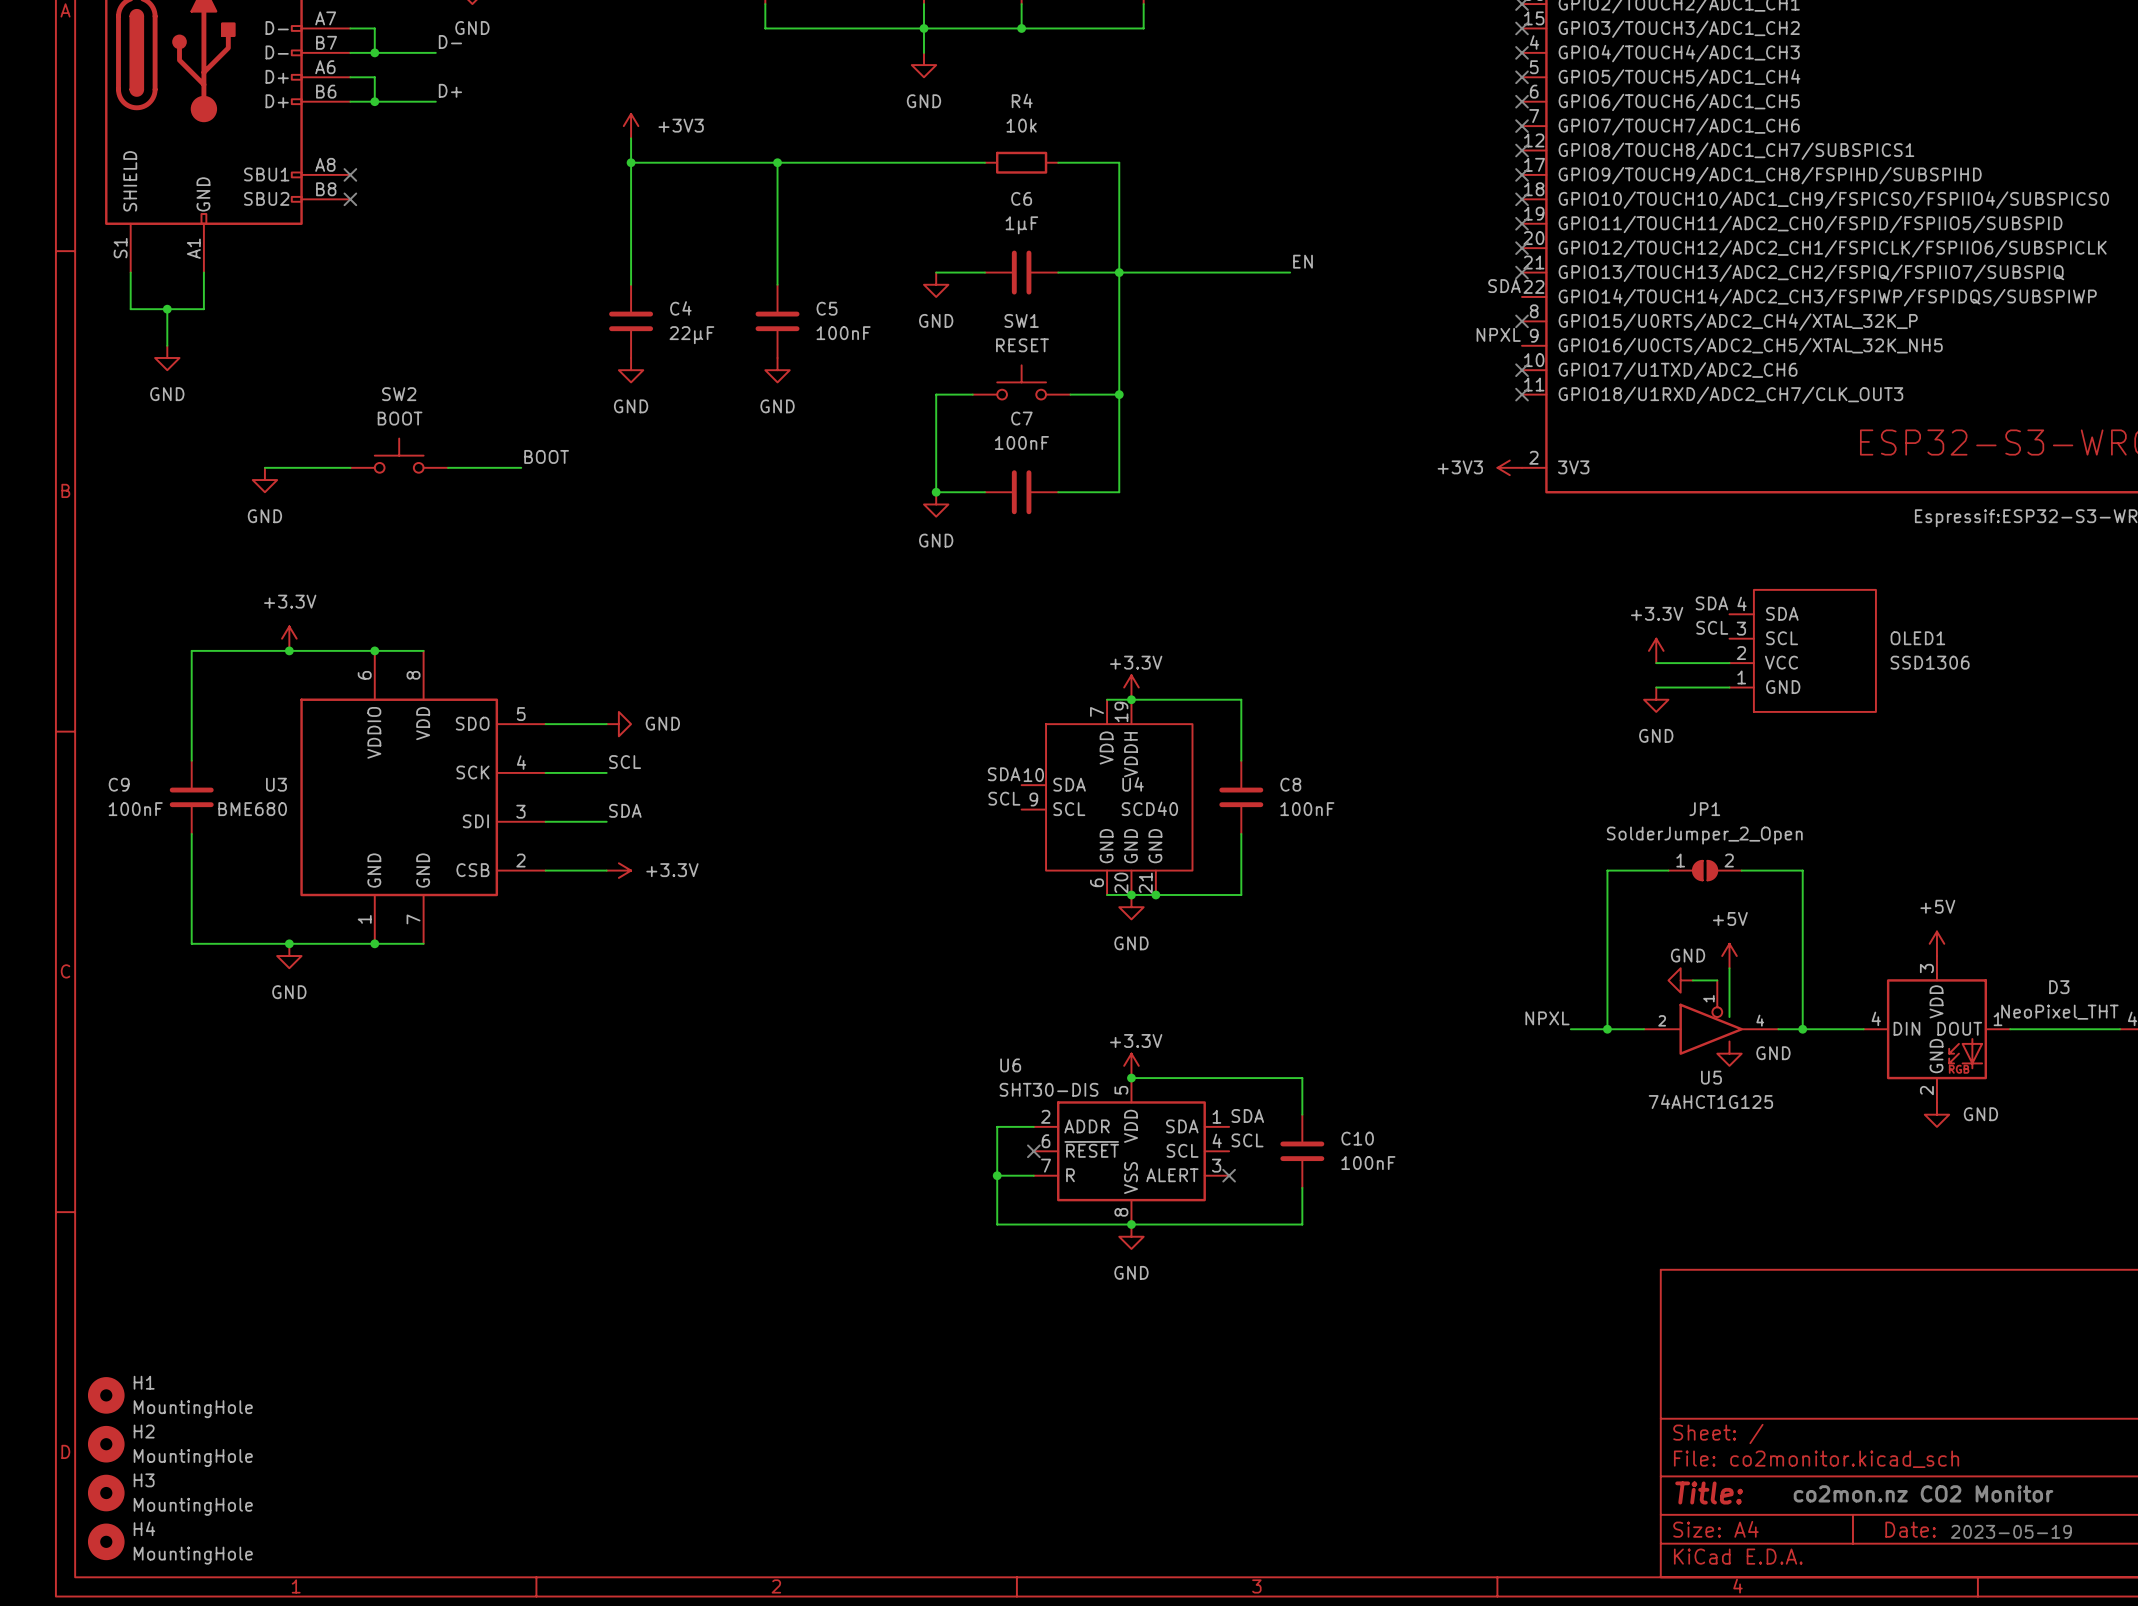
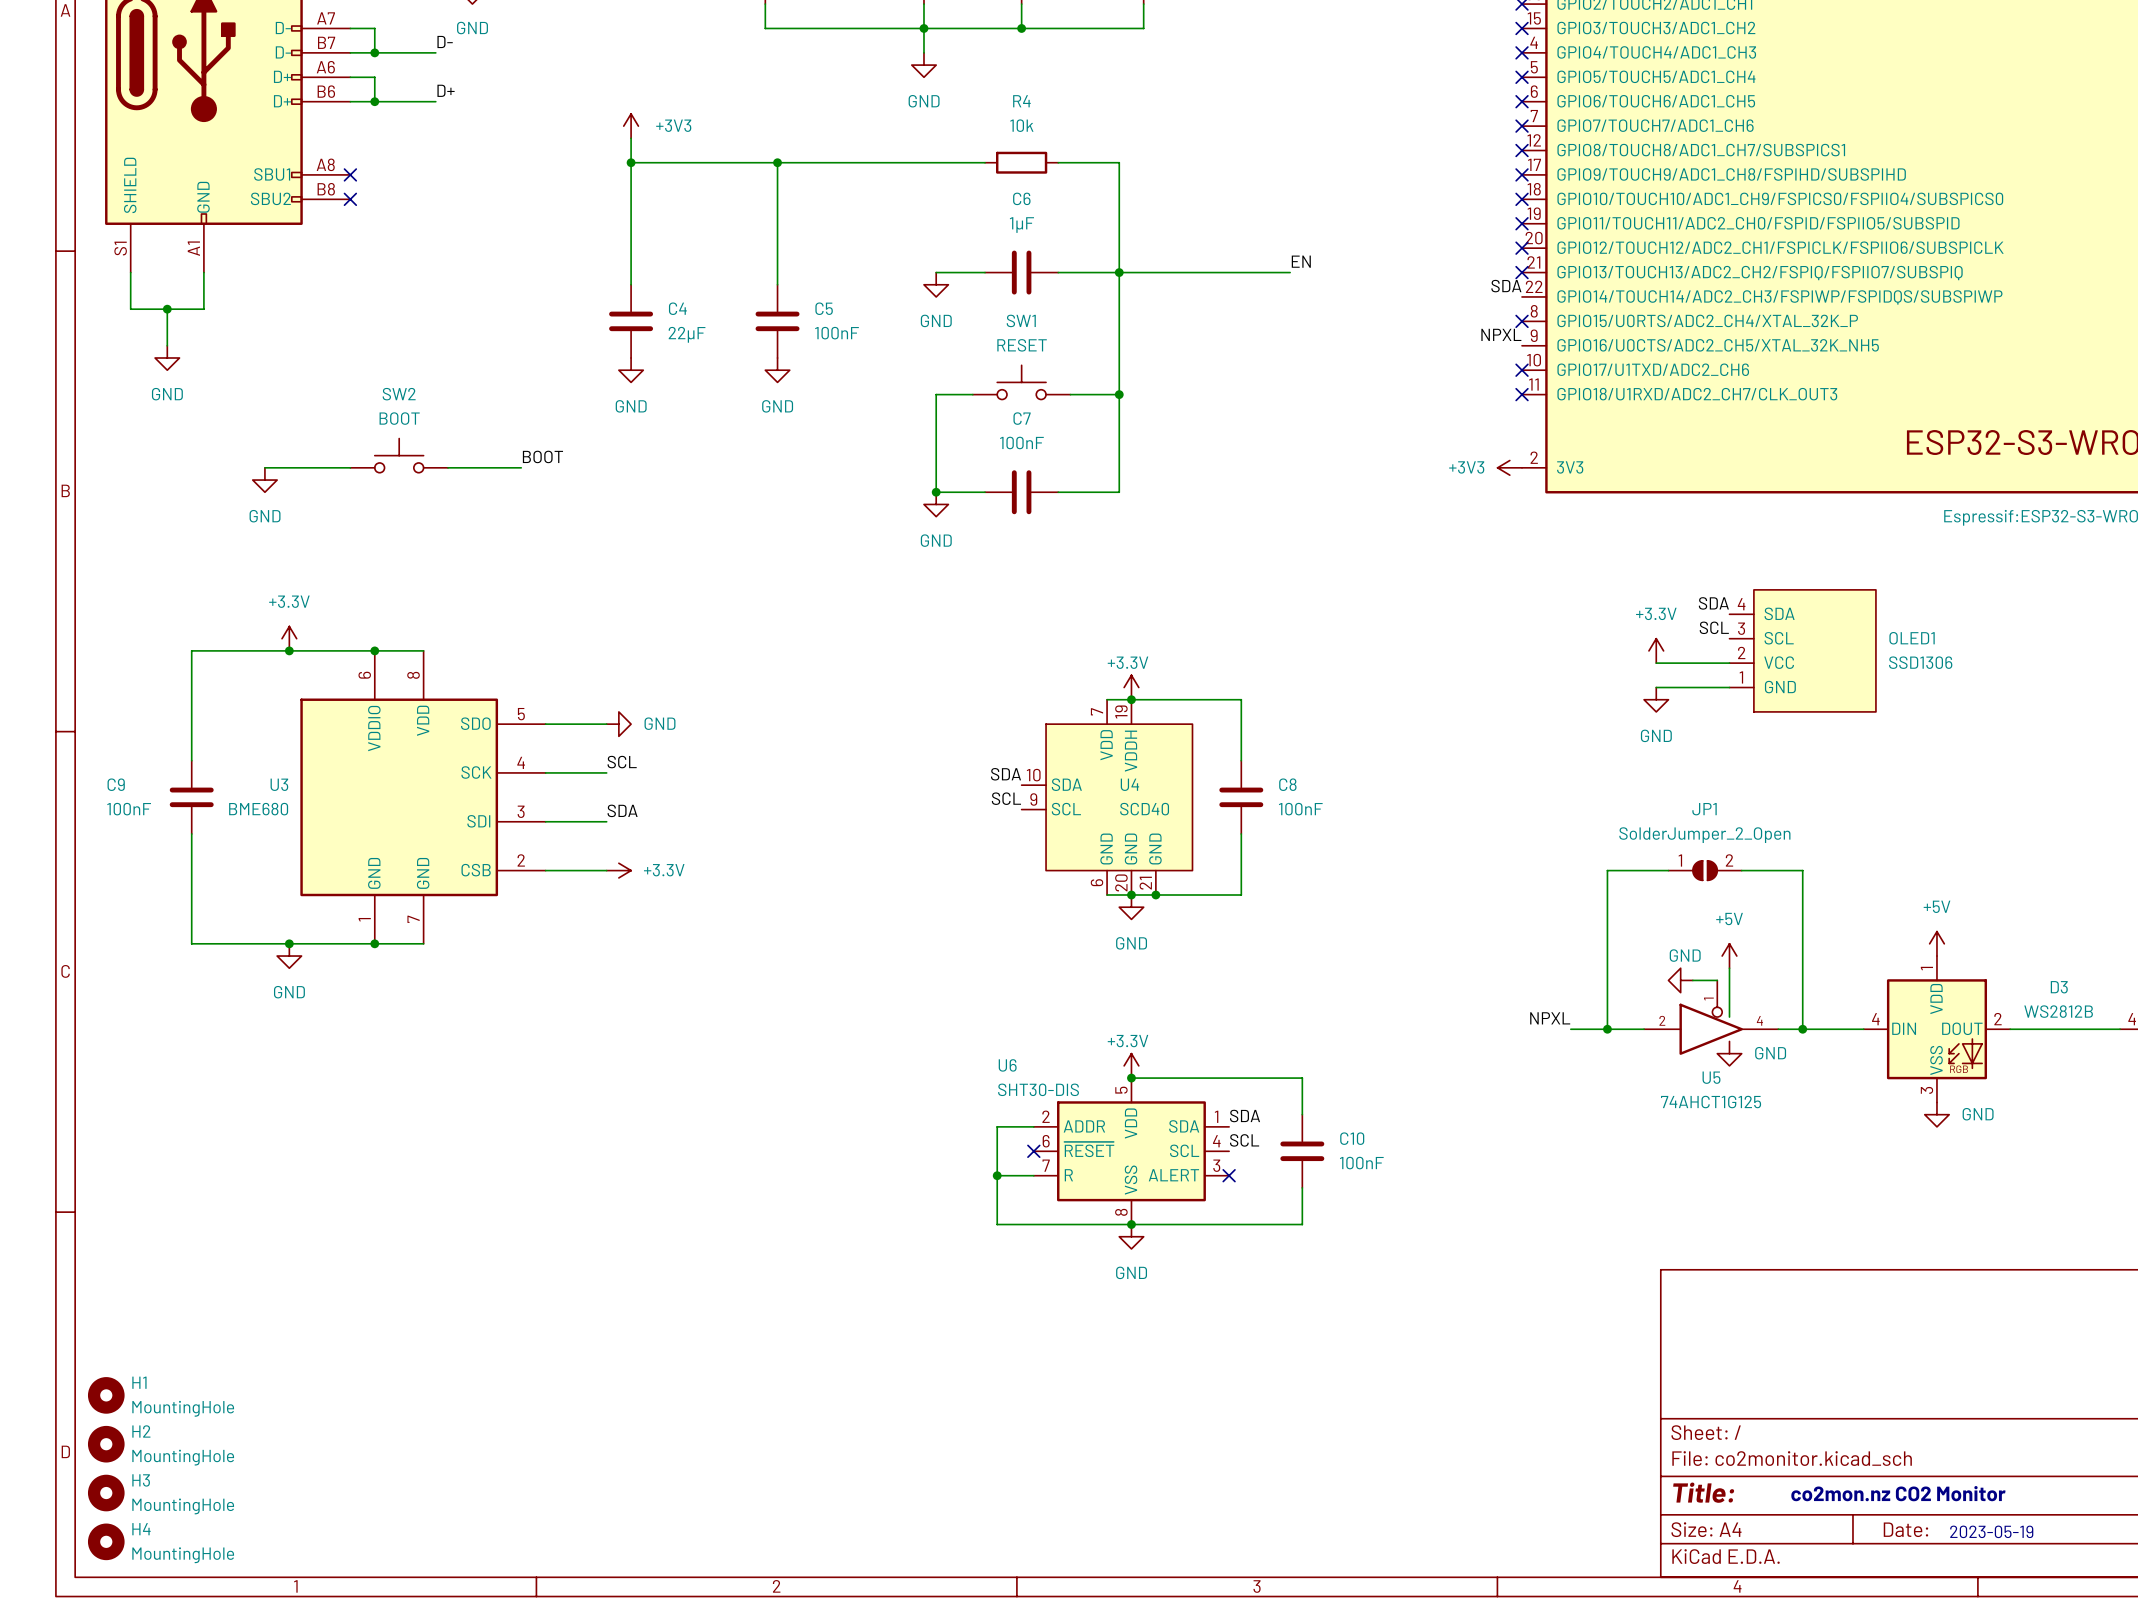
D3 pin number: 3 (1926, 968) -> 1 (1926, 968)
D3 value: NeoPixel_THT (2059, 1012) -> WS2812B (2058, 1011)
D3 pin number: 1 (1998, 1019) -> 2 (1997, 1019)
D3 pin name: GND (1936, 1056) -> VSS (1936, 1060)
D3 pin number: 2 (1926, 1090) -> 3 (1926, 1090)

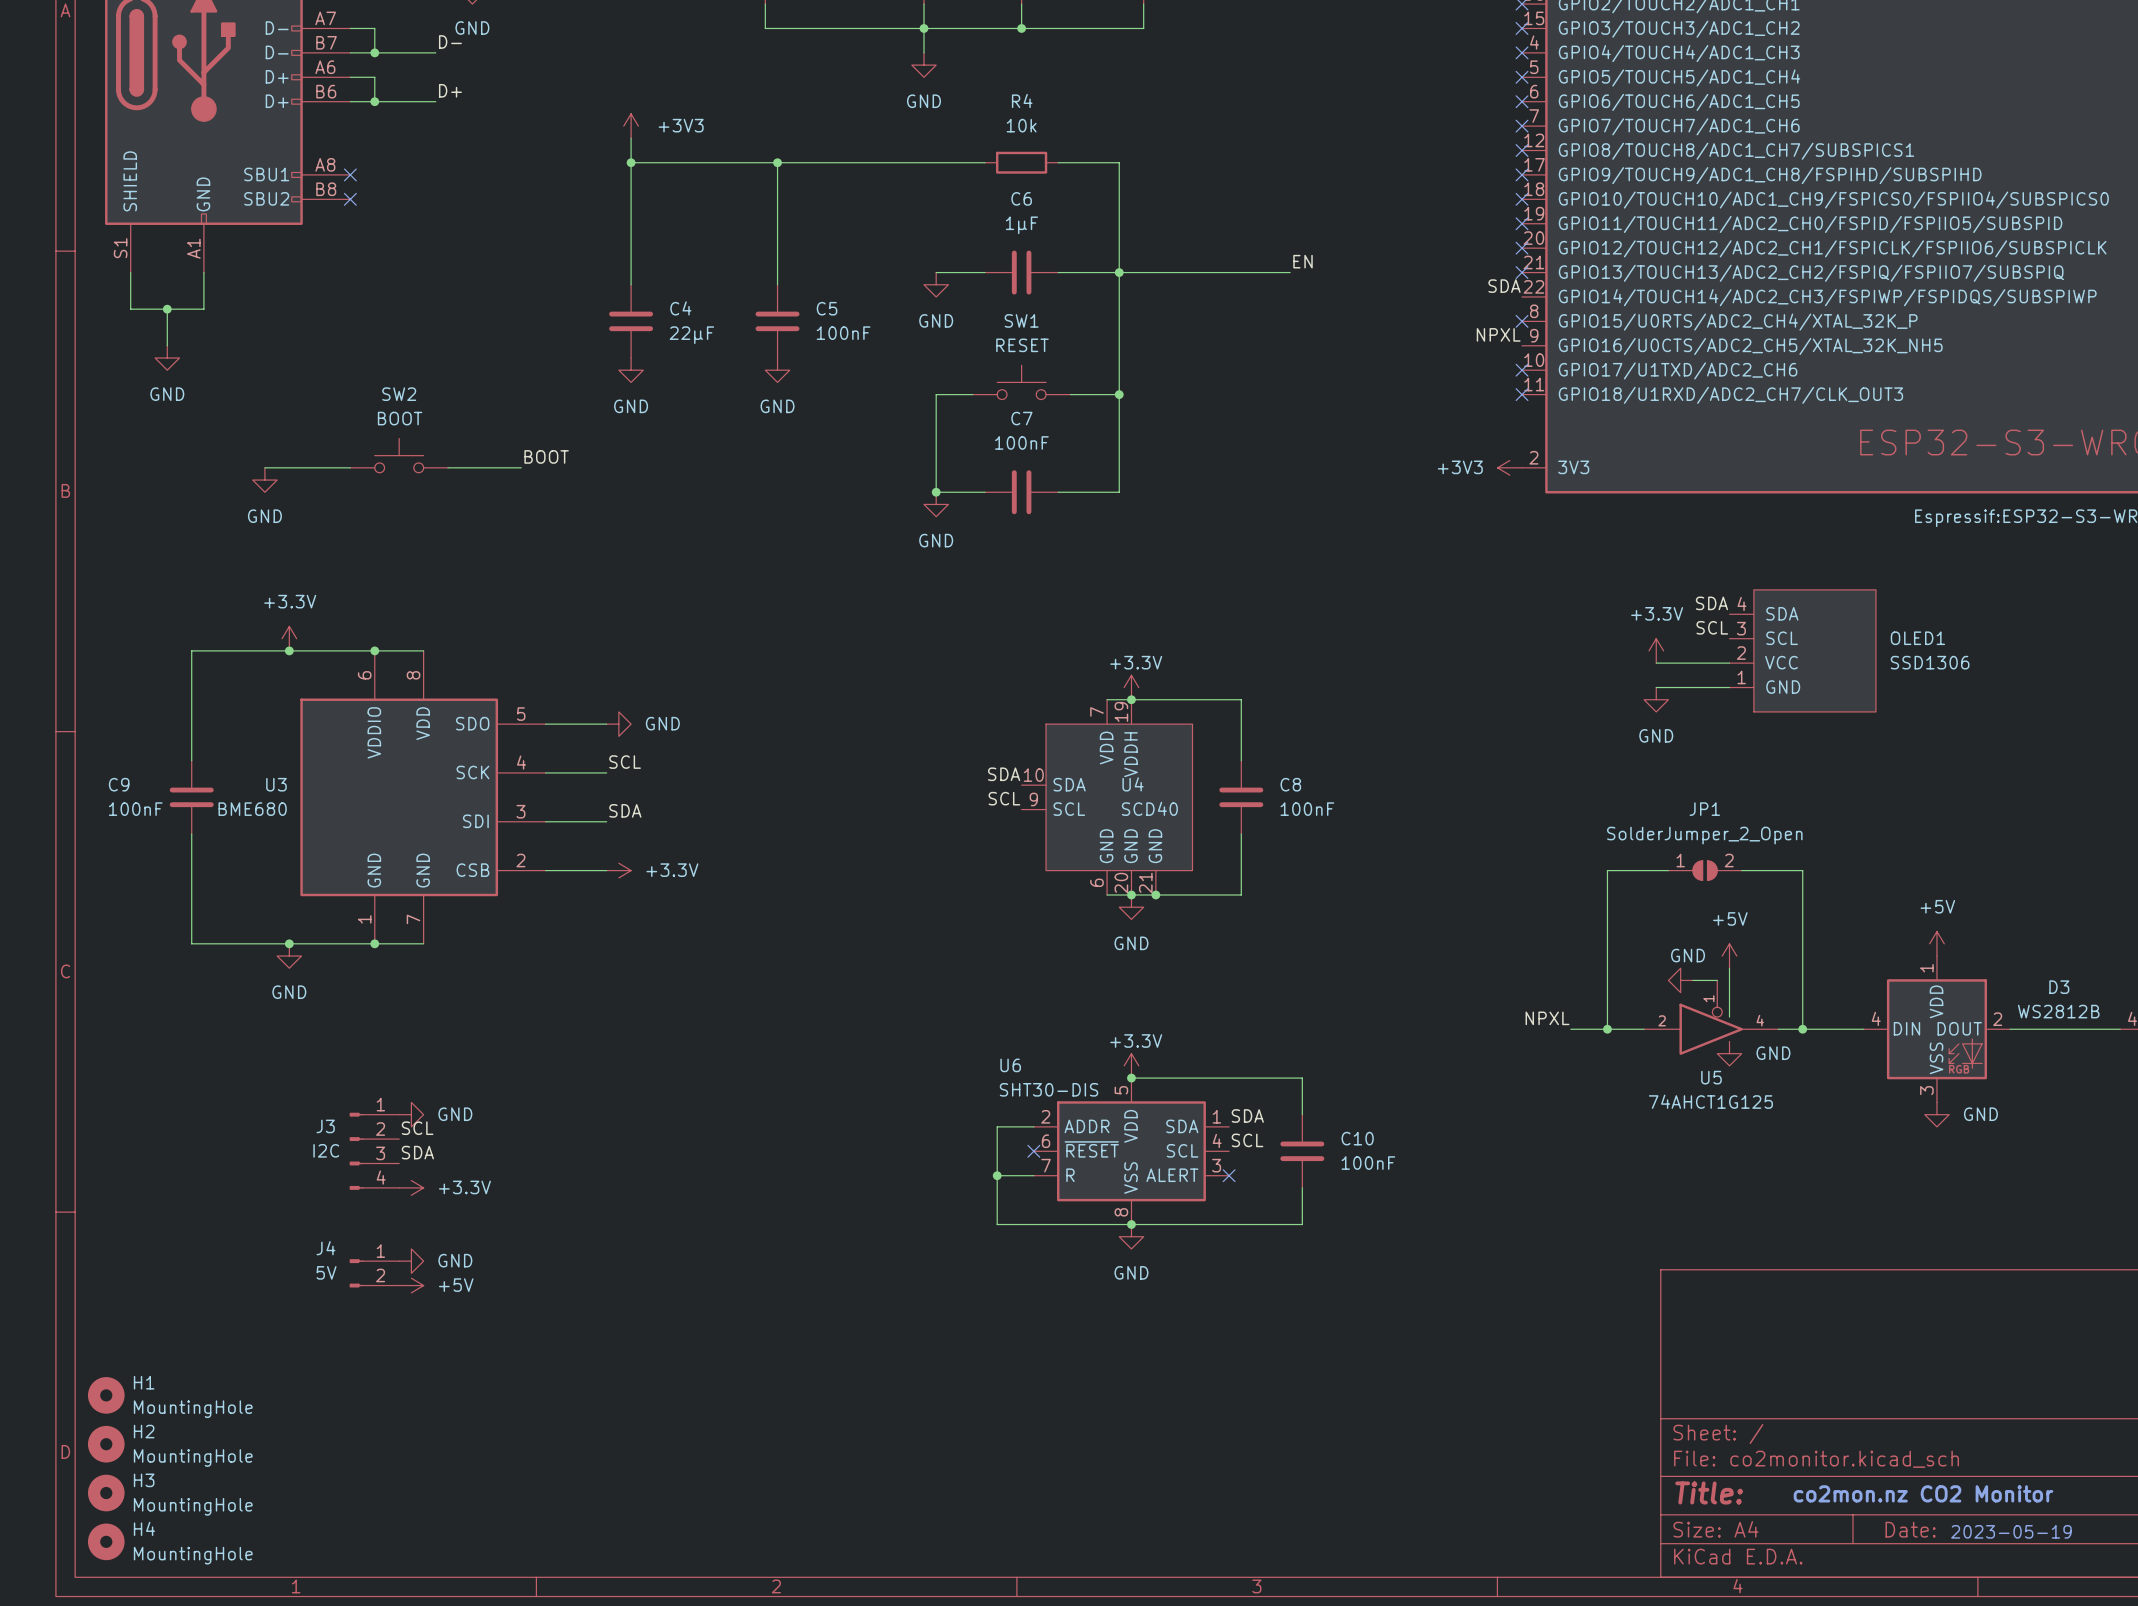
power symbol: none -> GND (411, 1114)
label: none -> SCL (417, 1128)
J3: none -> I2C (374, 1151)
label: none -> SDA (417, 1152)
power symbol: none -> +3.3V (411, 1187)
power symbol: none -> GND (411, 1261)
J4: none -> 5V (374, 1273)
power symbol: none -> +5V (411, 1285)

